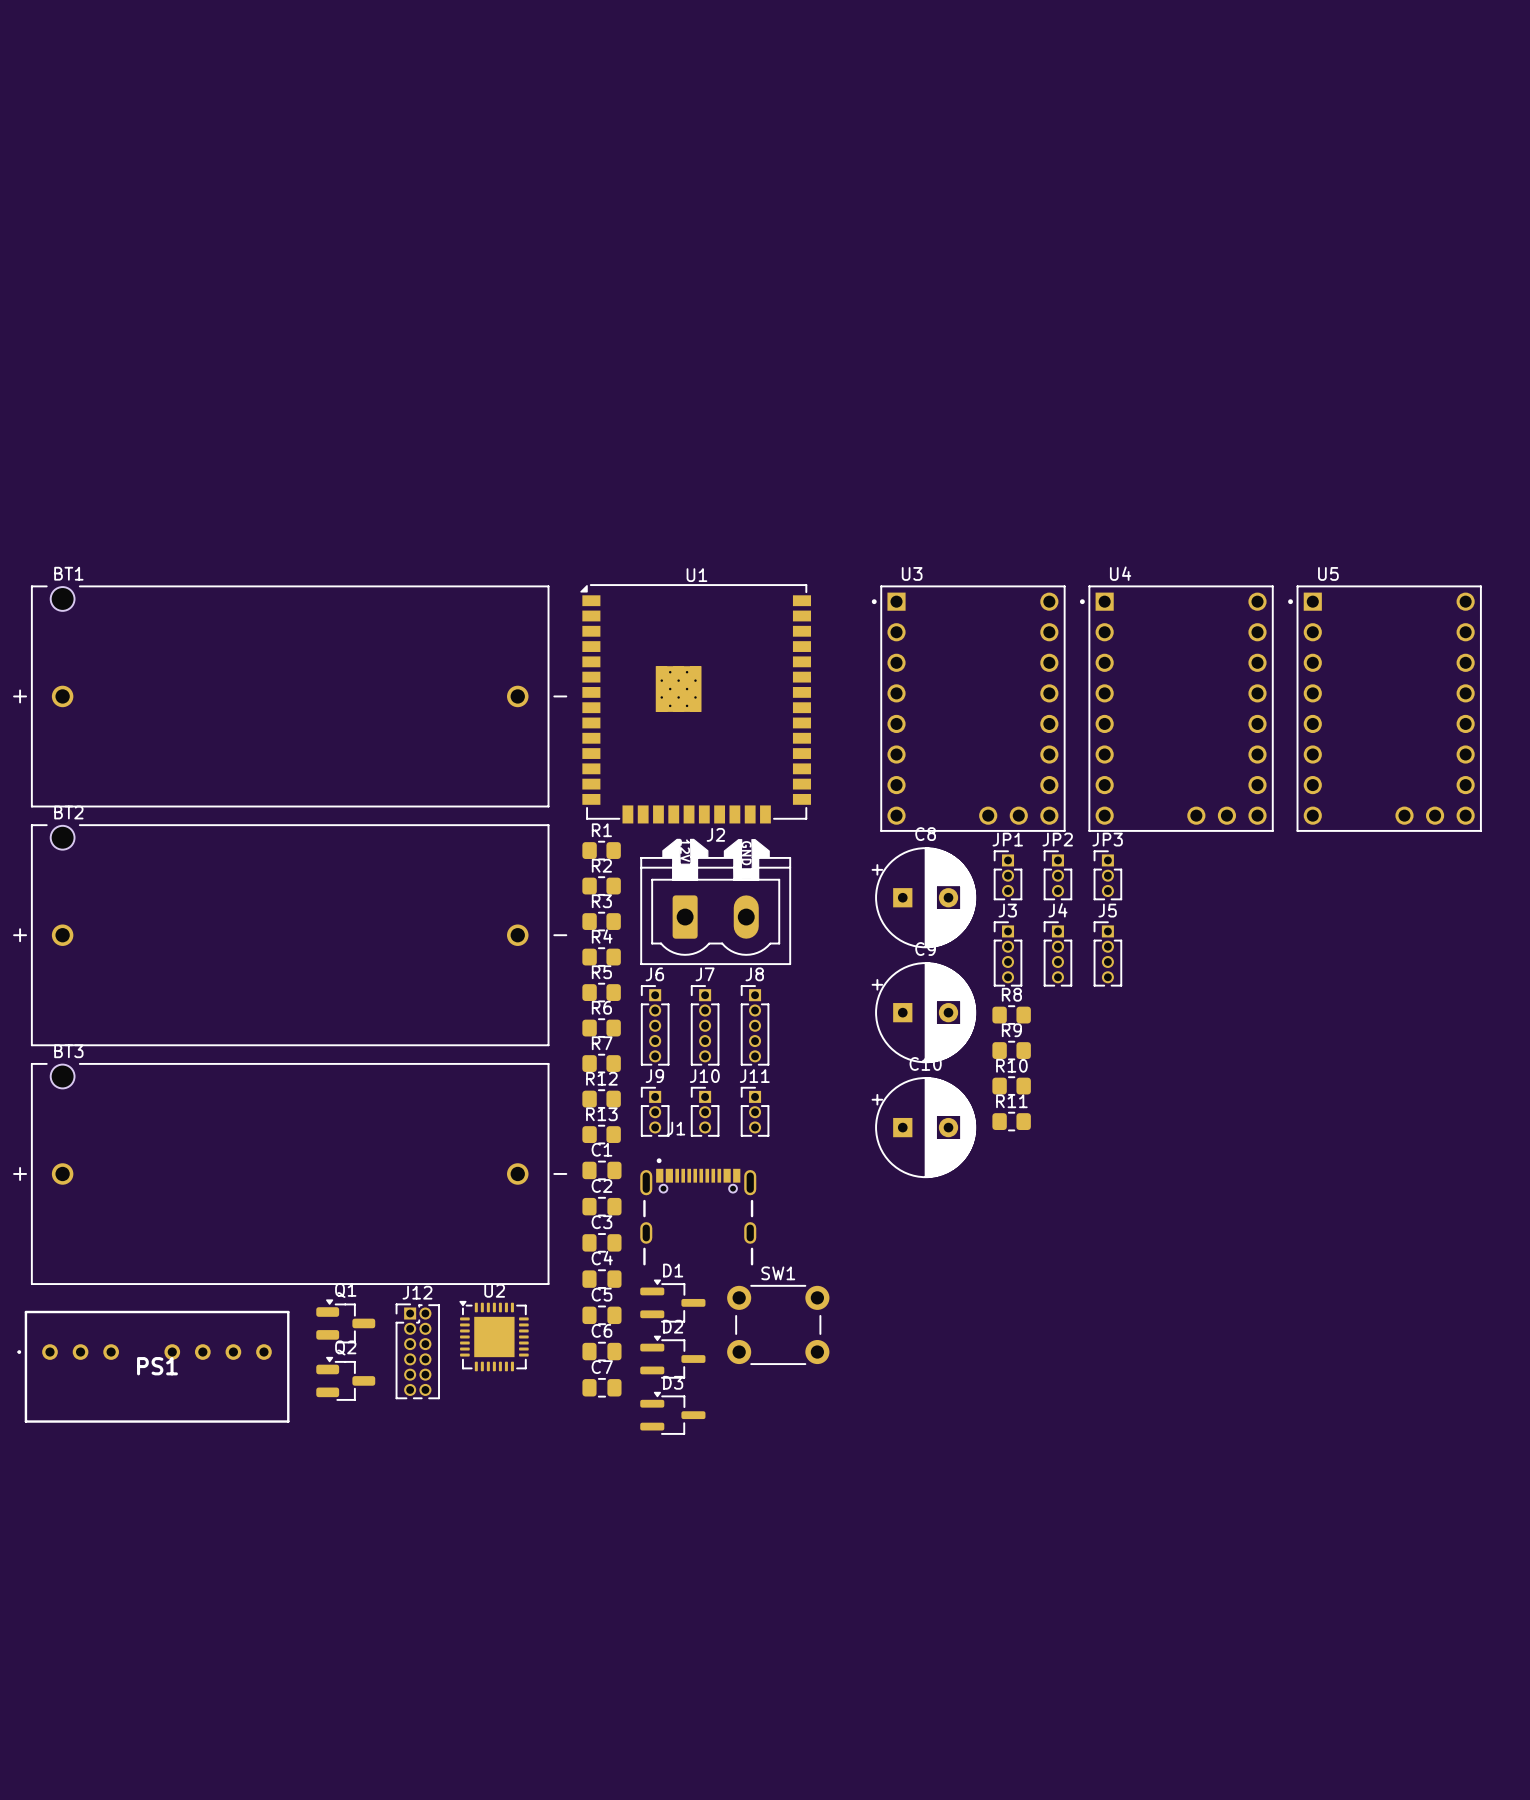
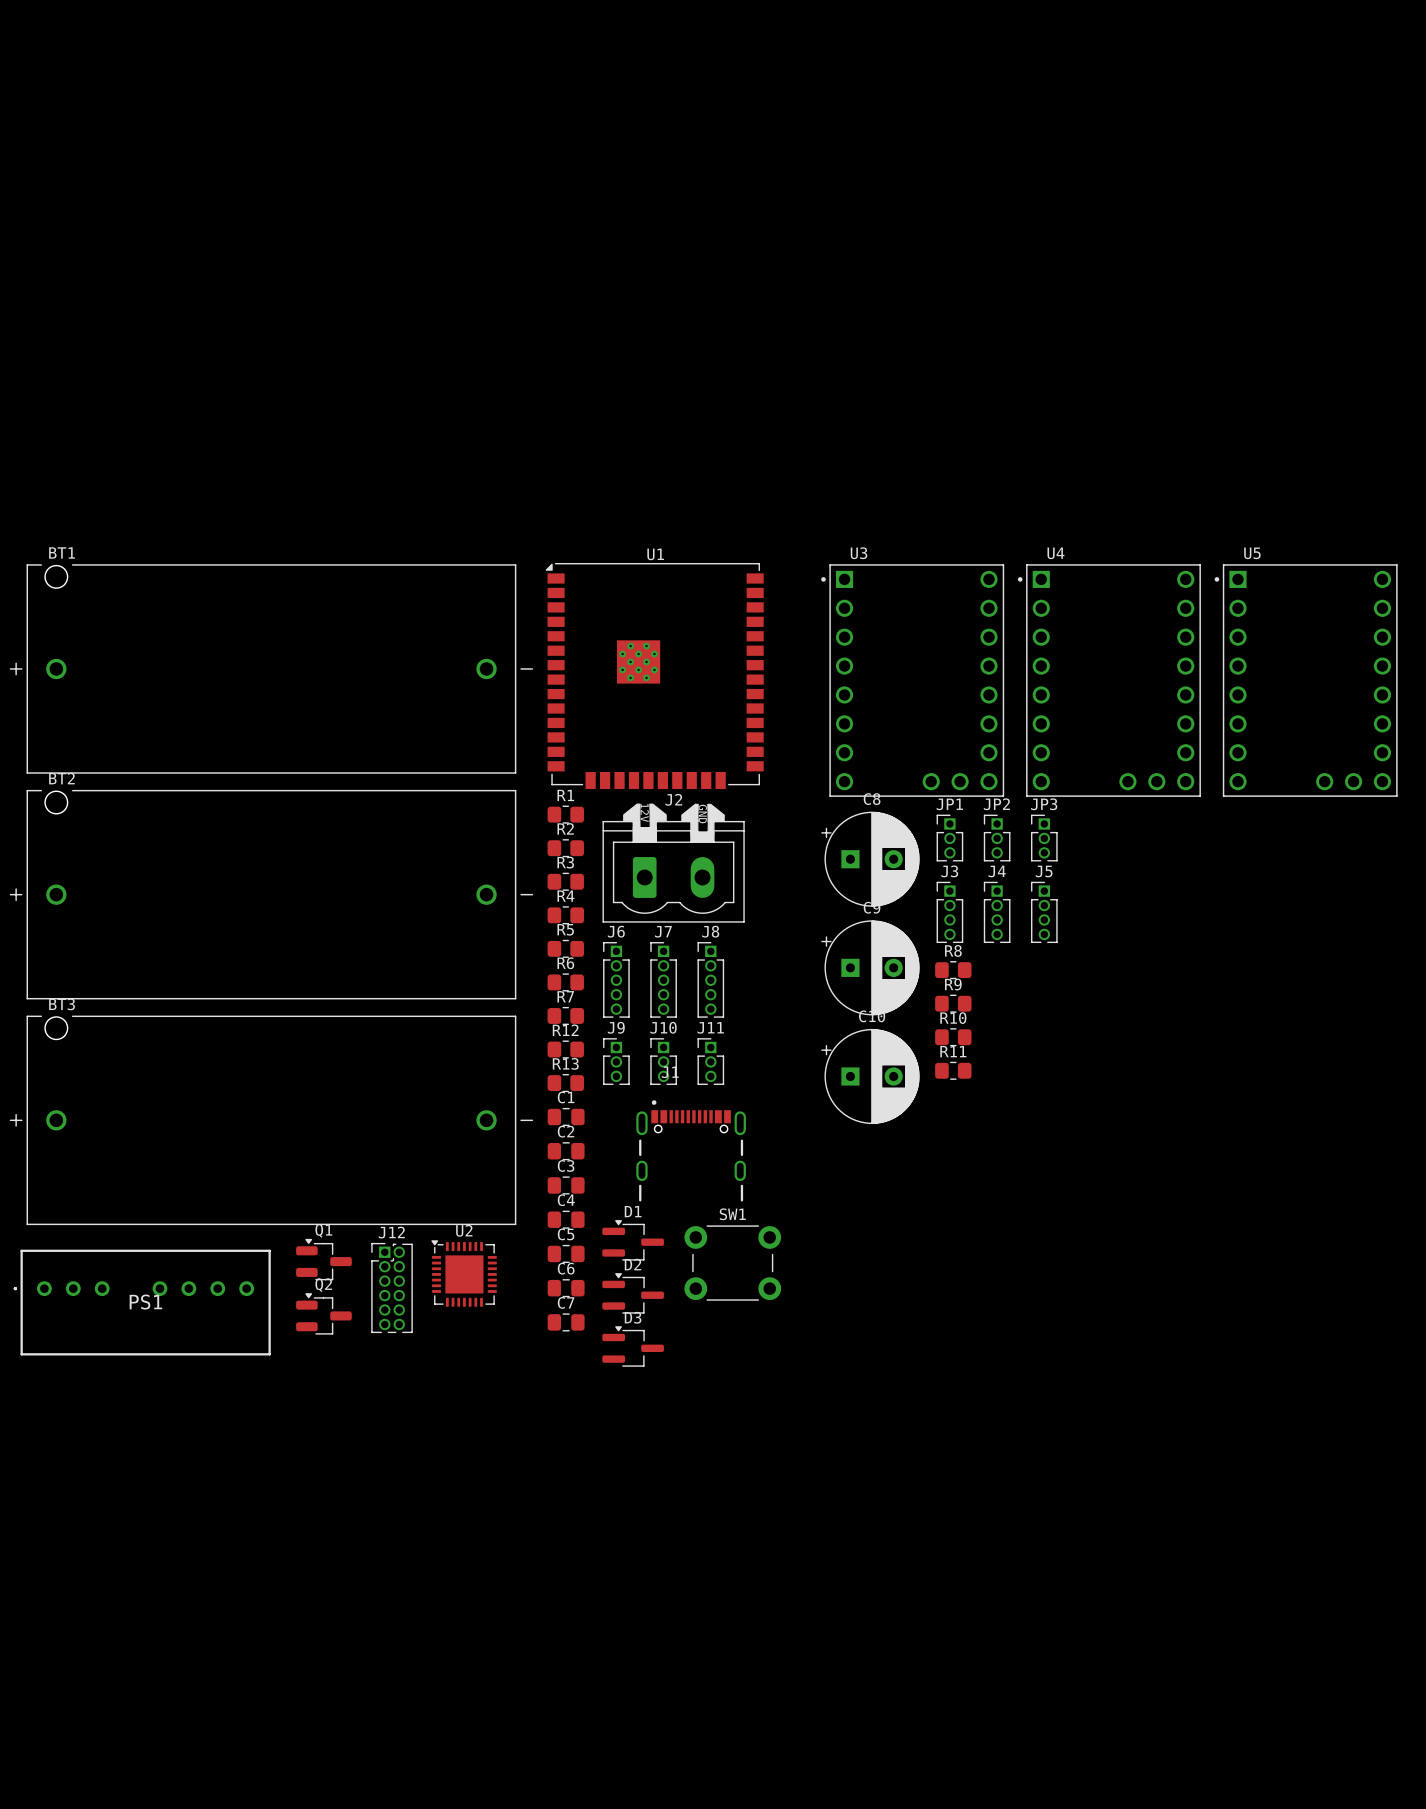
J1 position: (698, 1211) -> (691, 1150)

